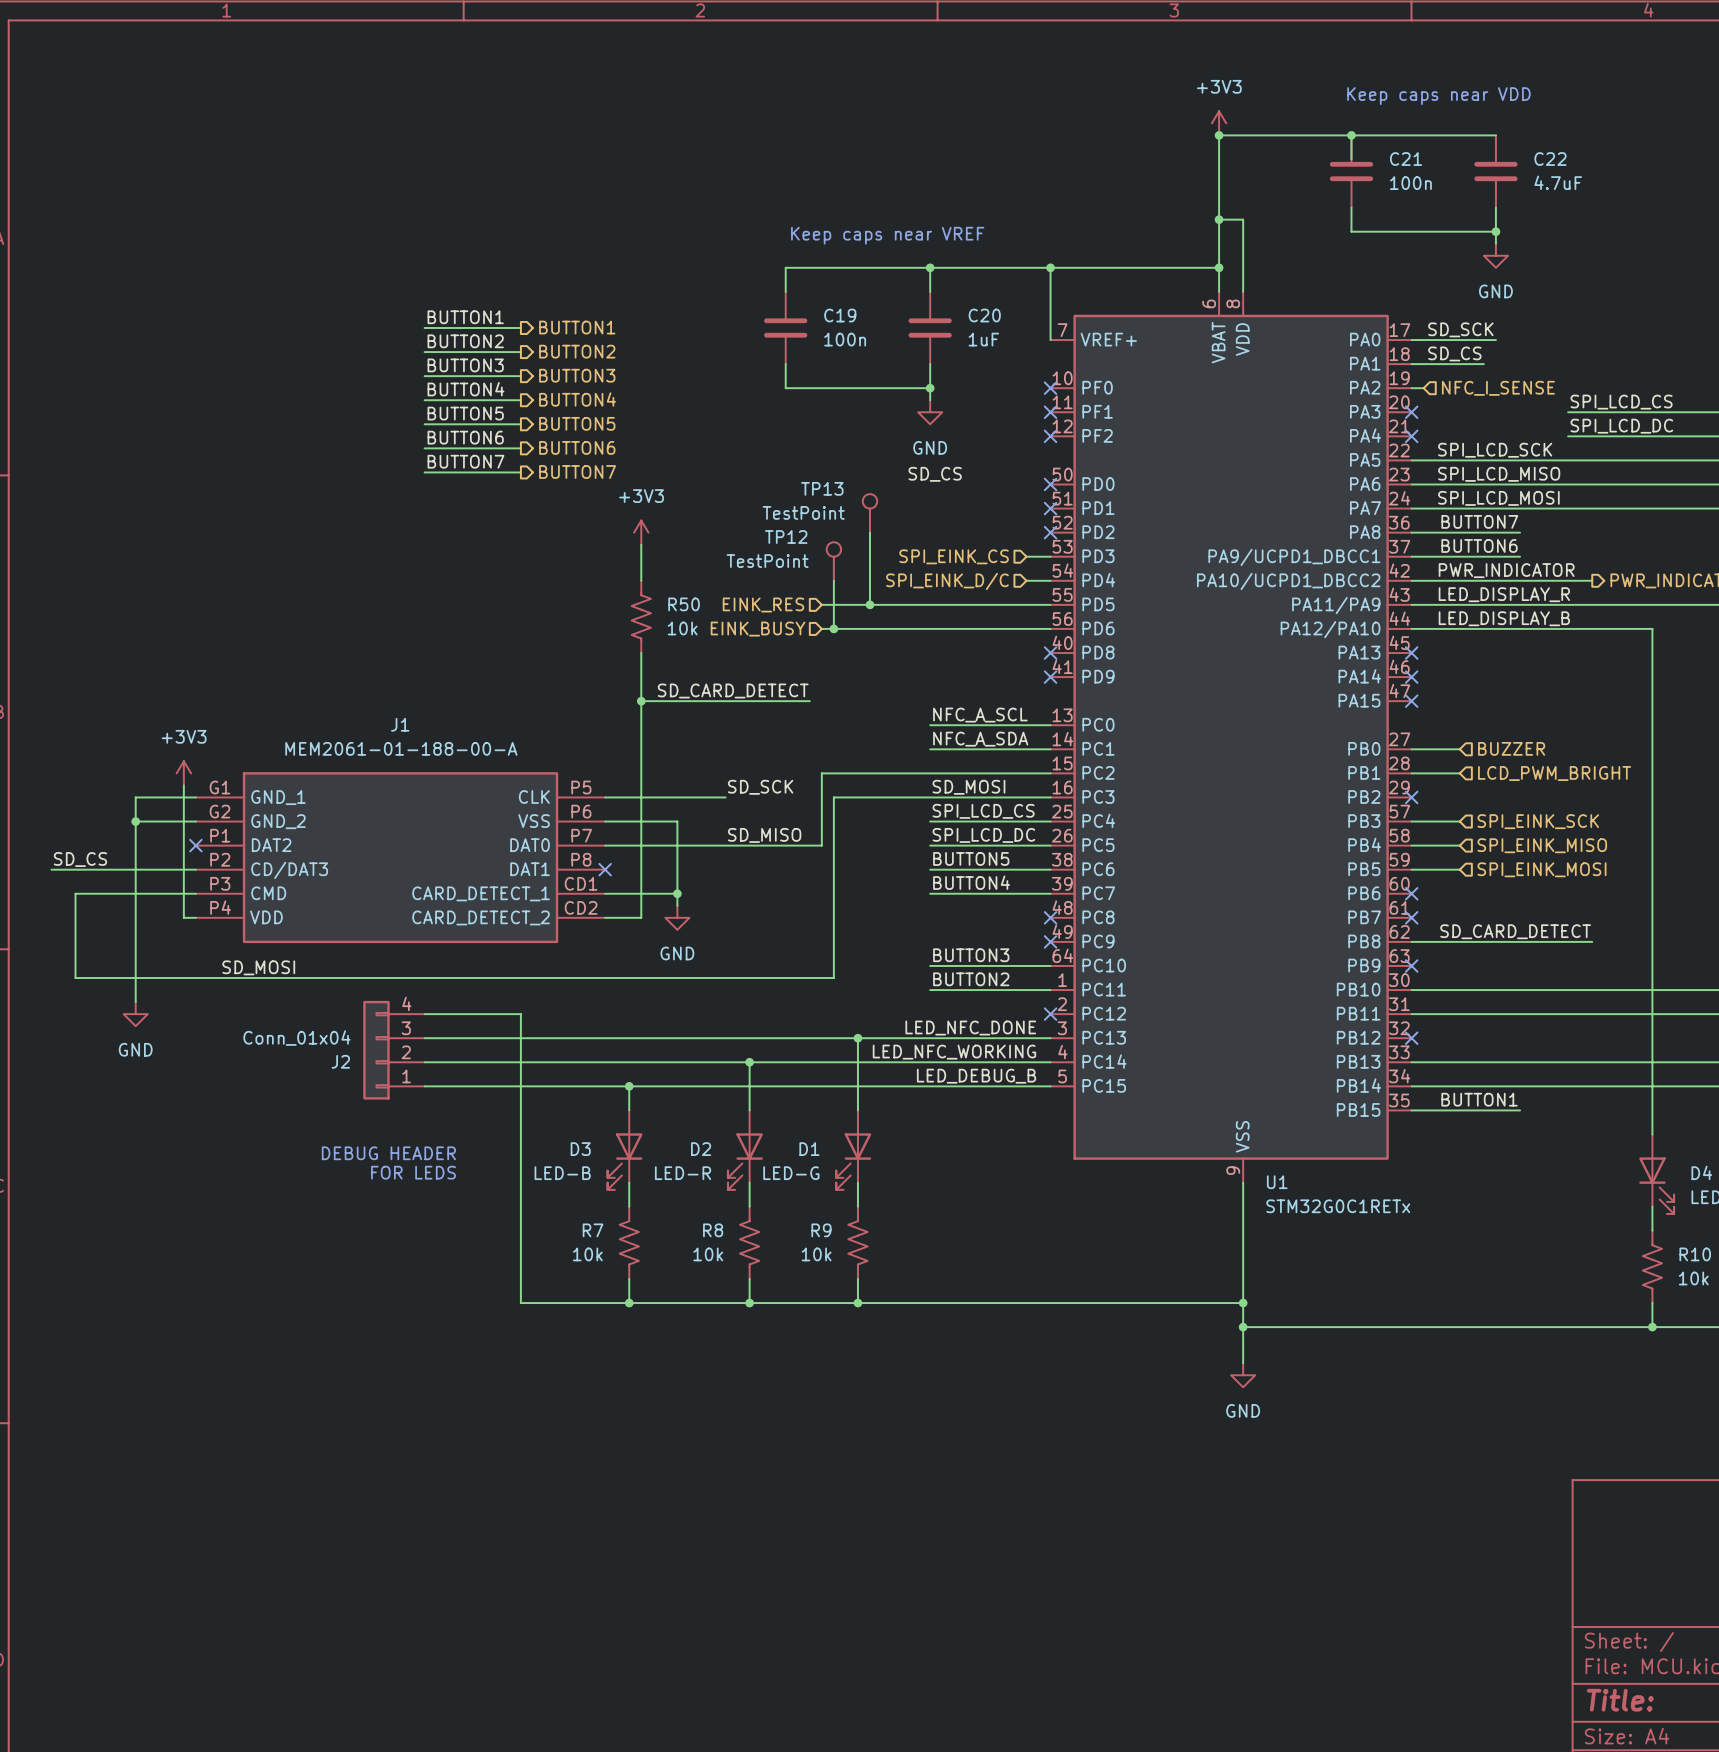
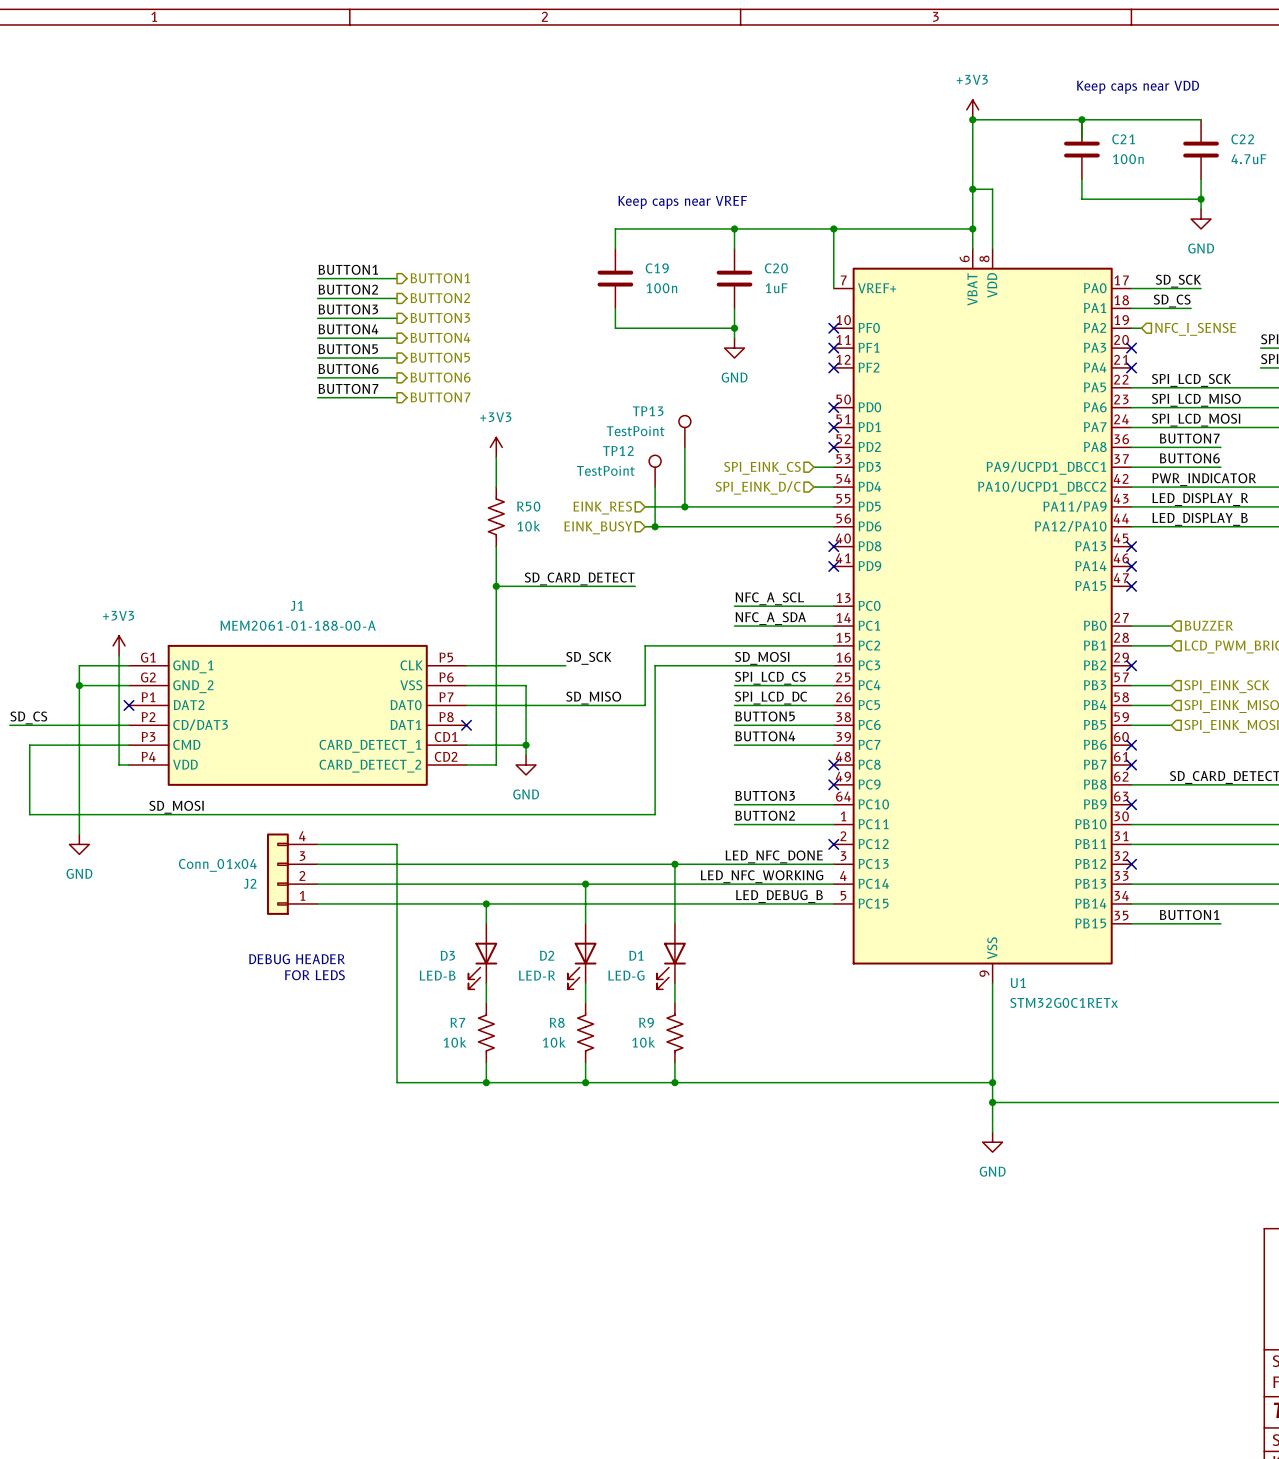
label: SD_CS (935, 474) -> none

